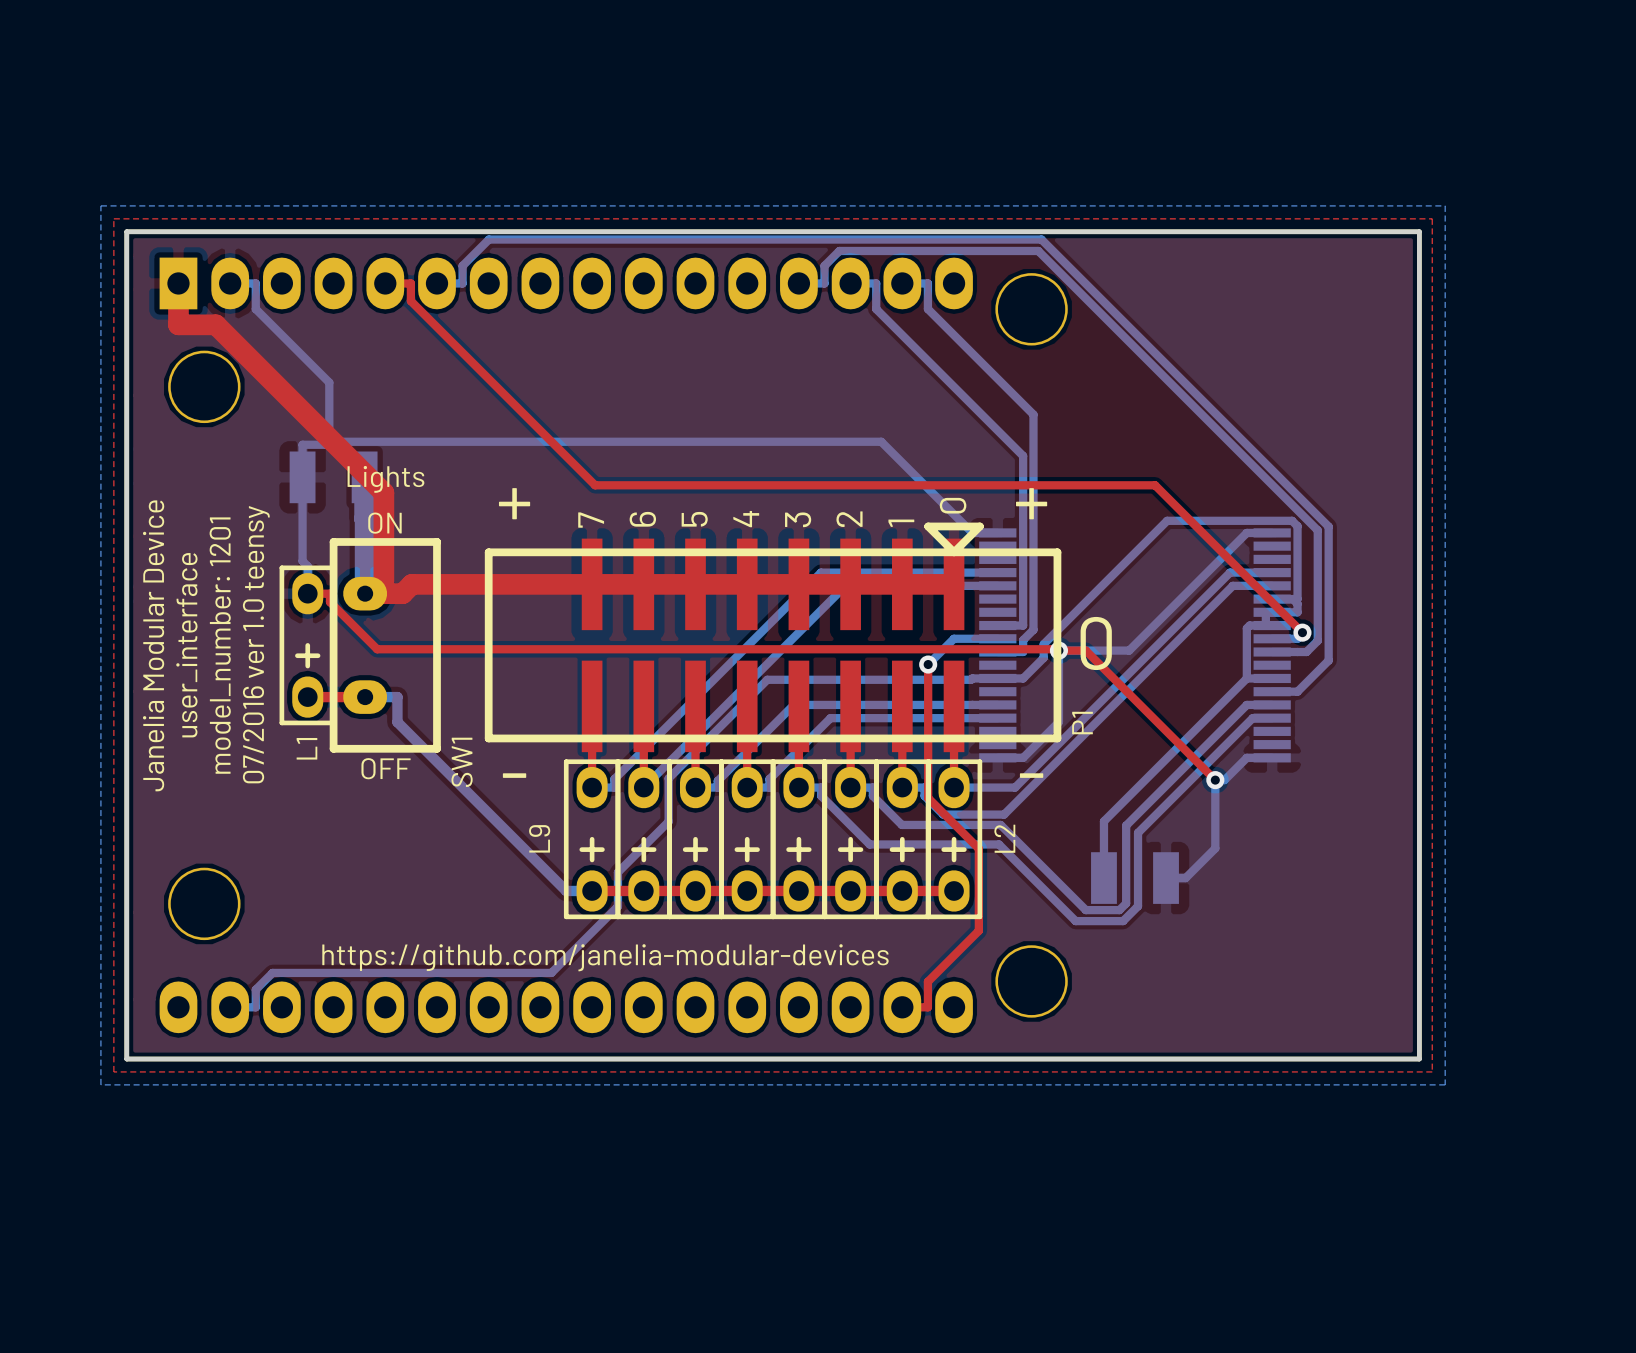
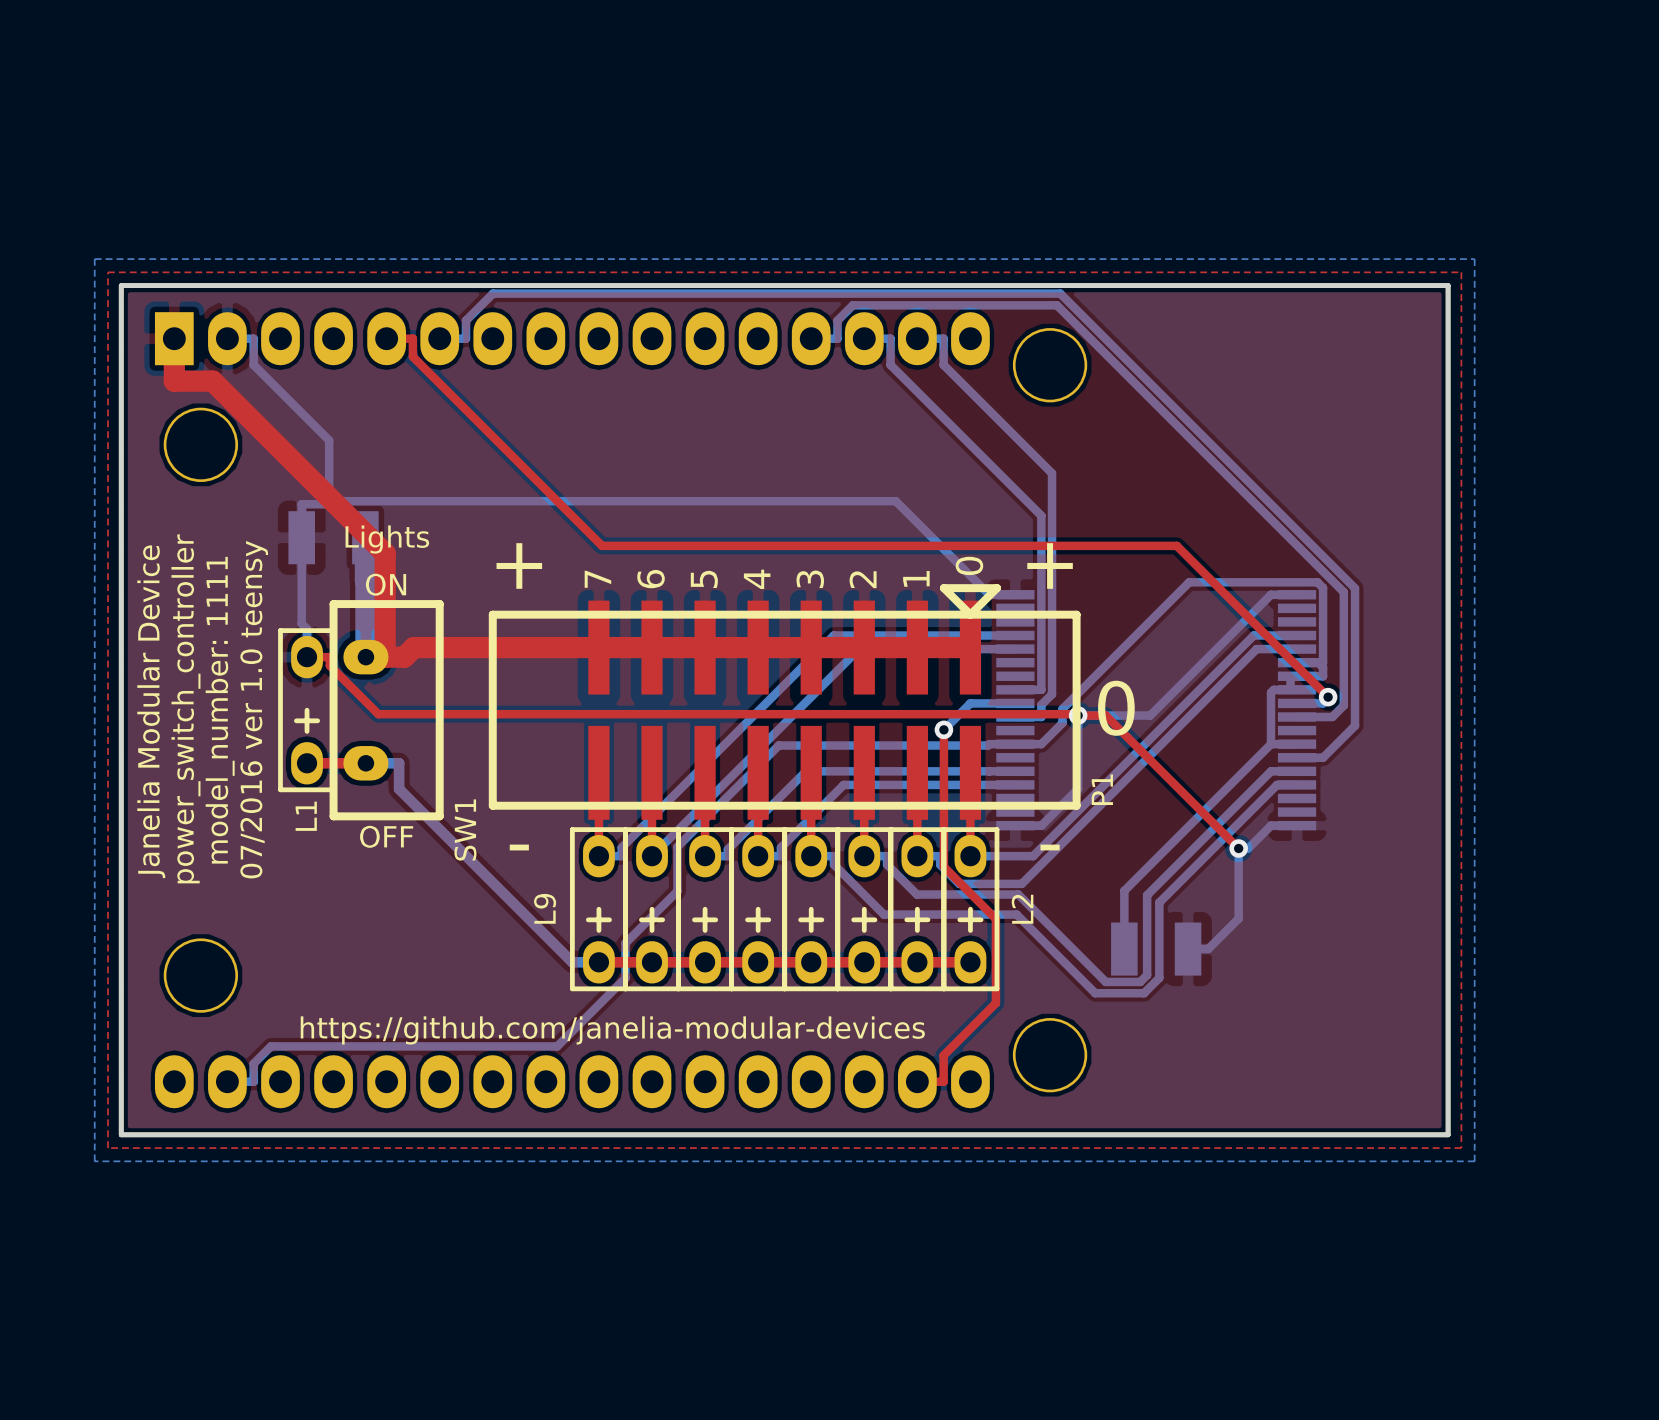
text: user_interface (186, 645) -> power_switch_controller (185, 708)
text: model_number: 1201 (220, 645) -> model_number: 1111 (220, 710)

